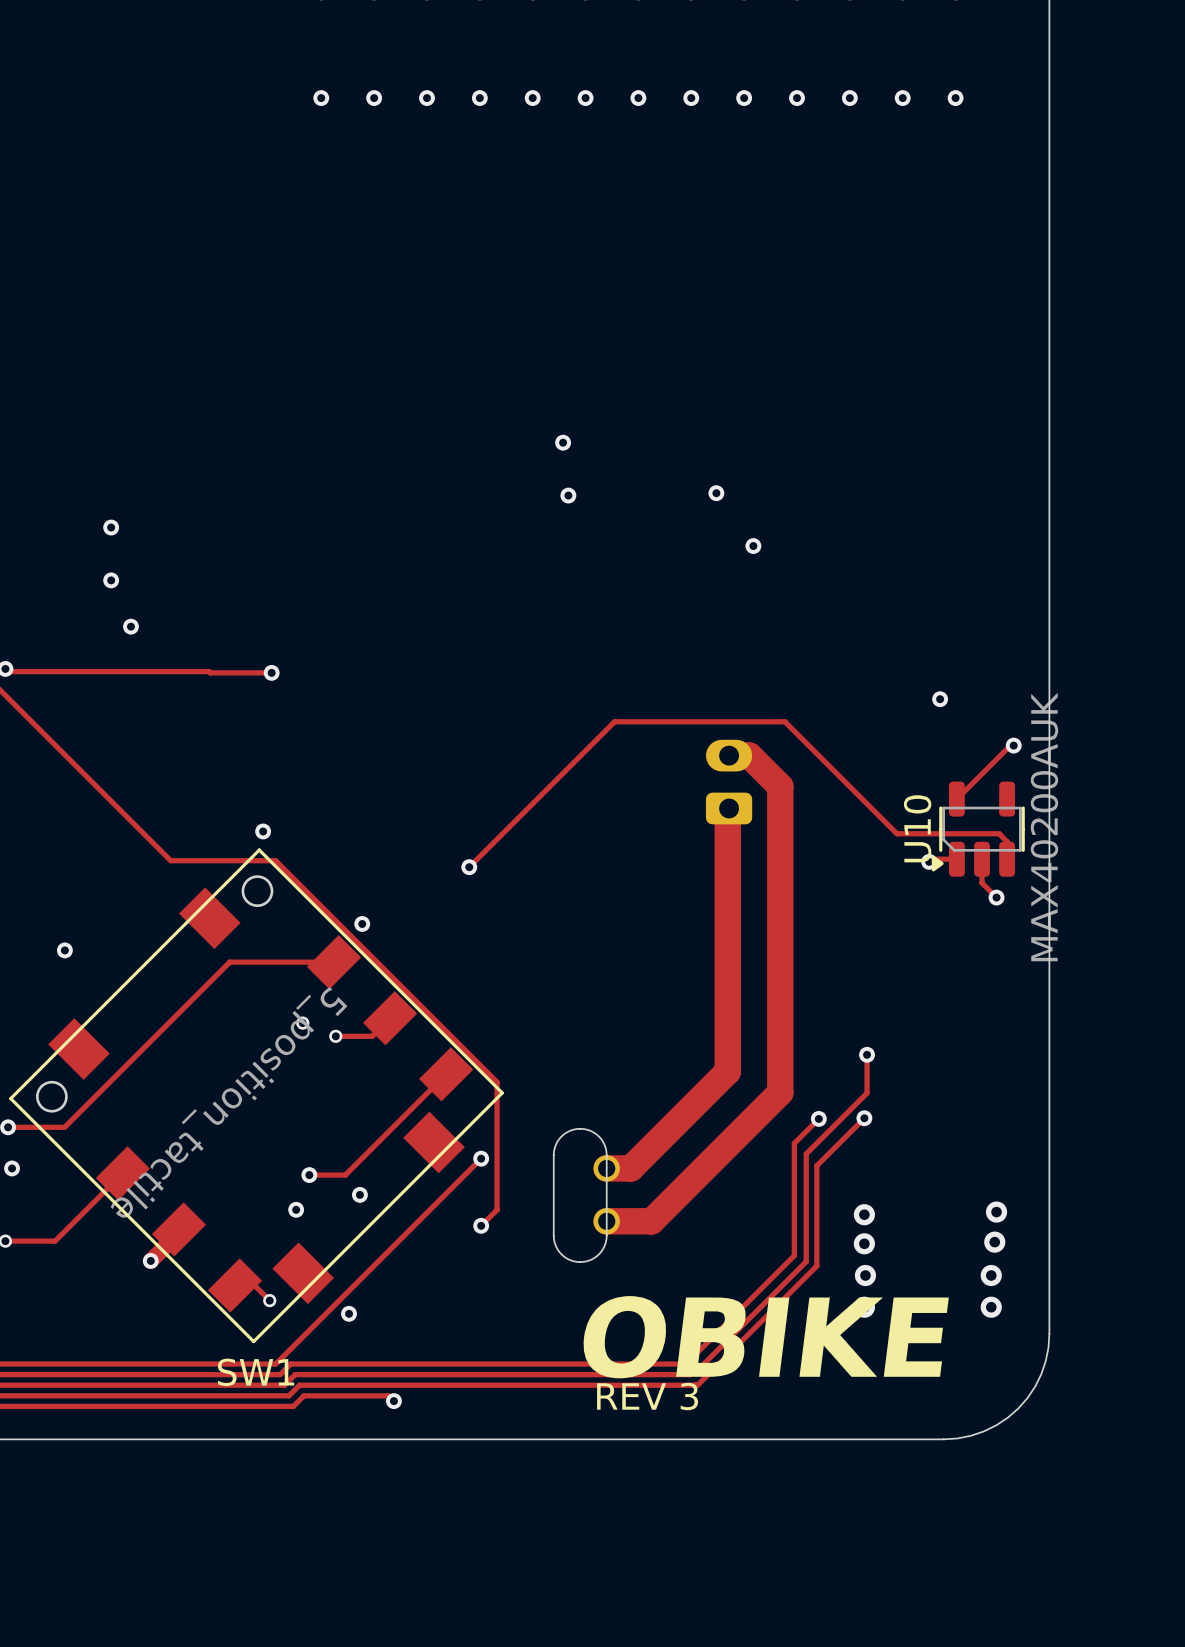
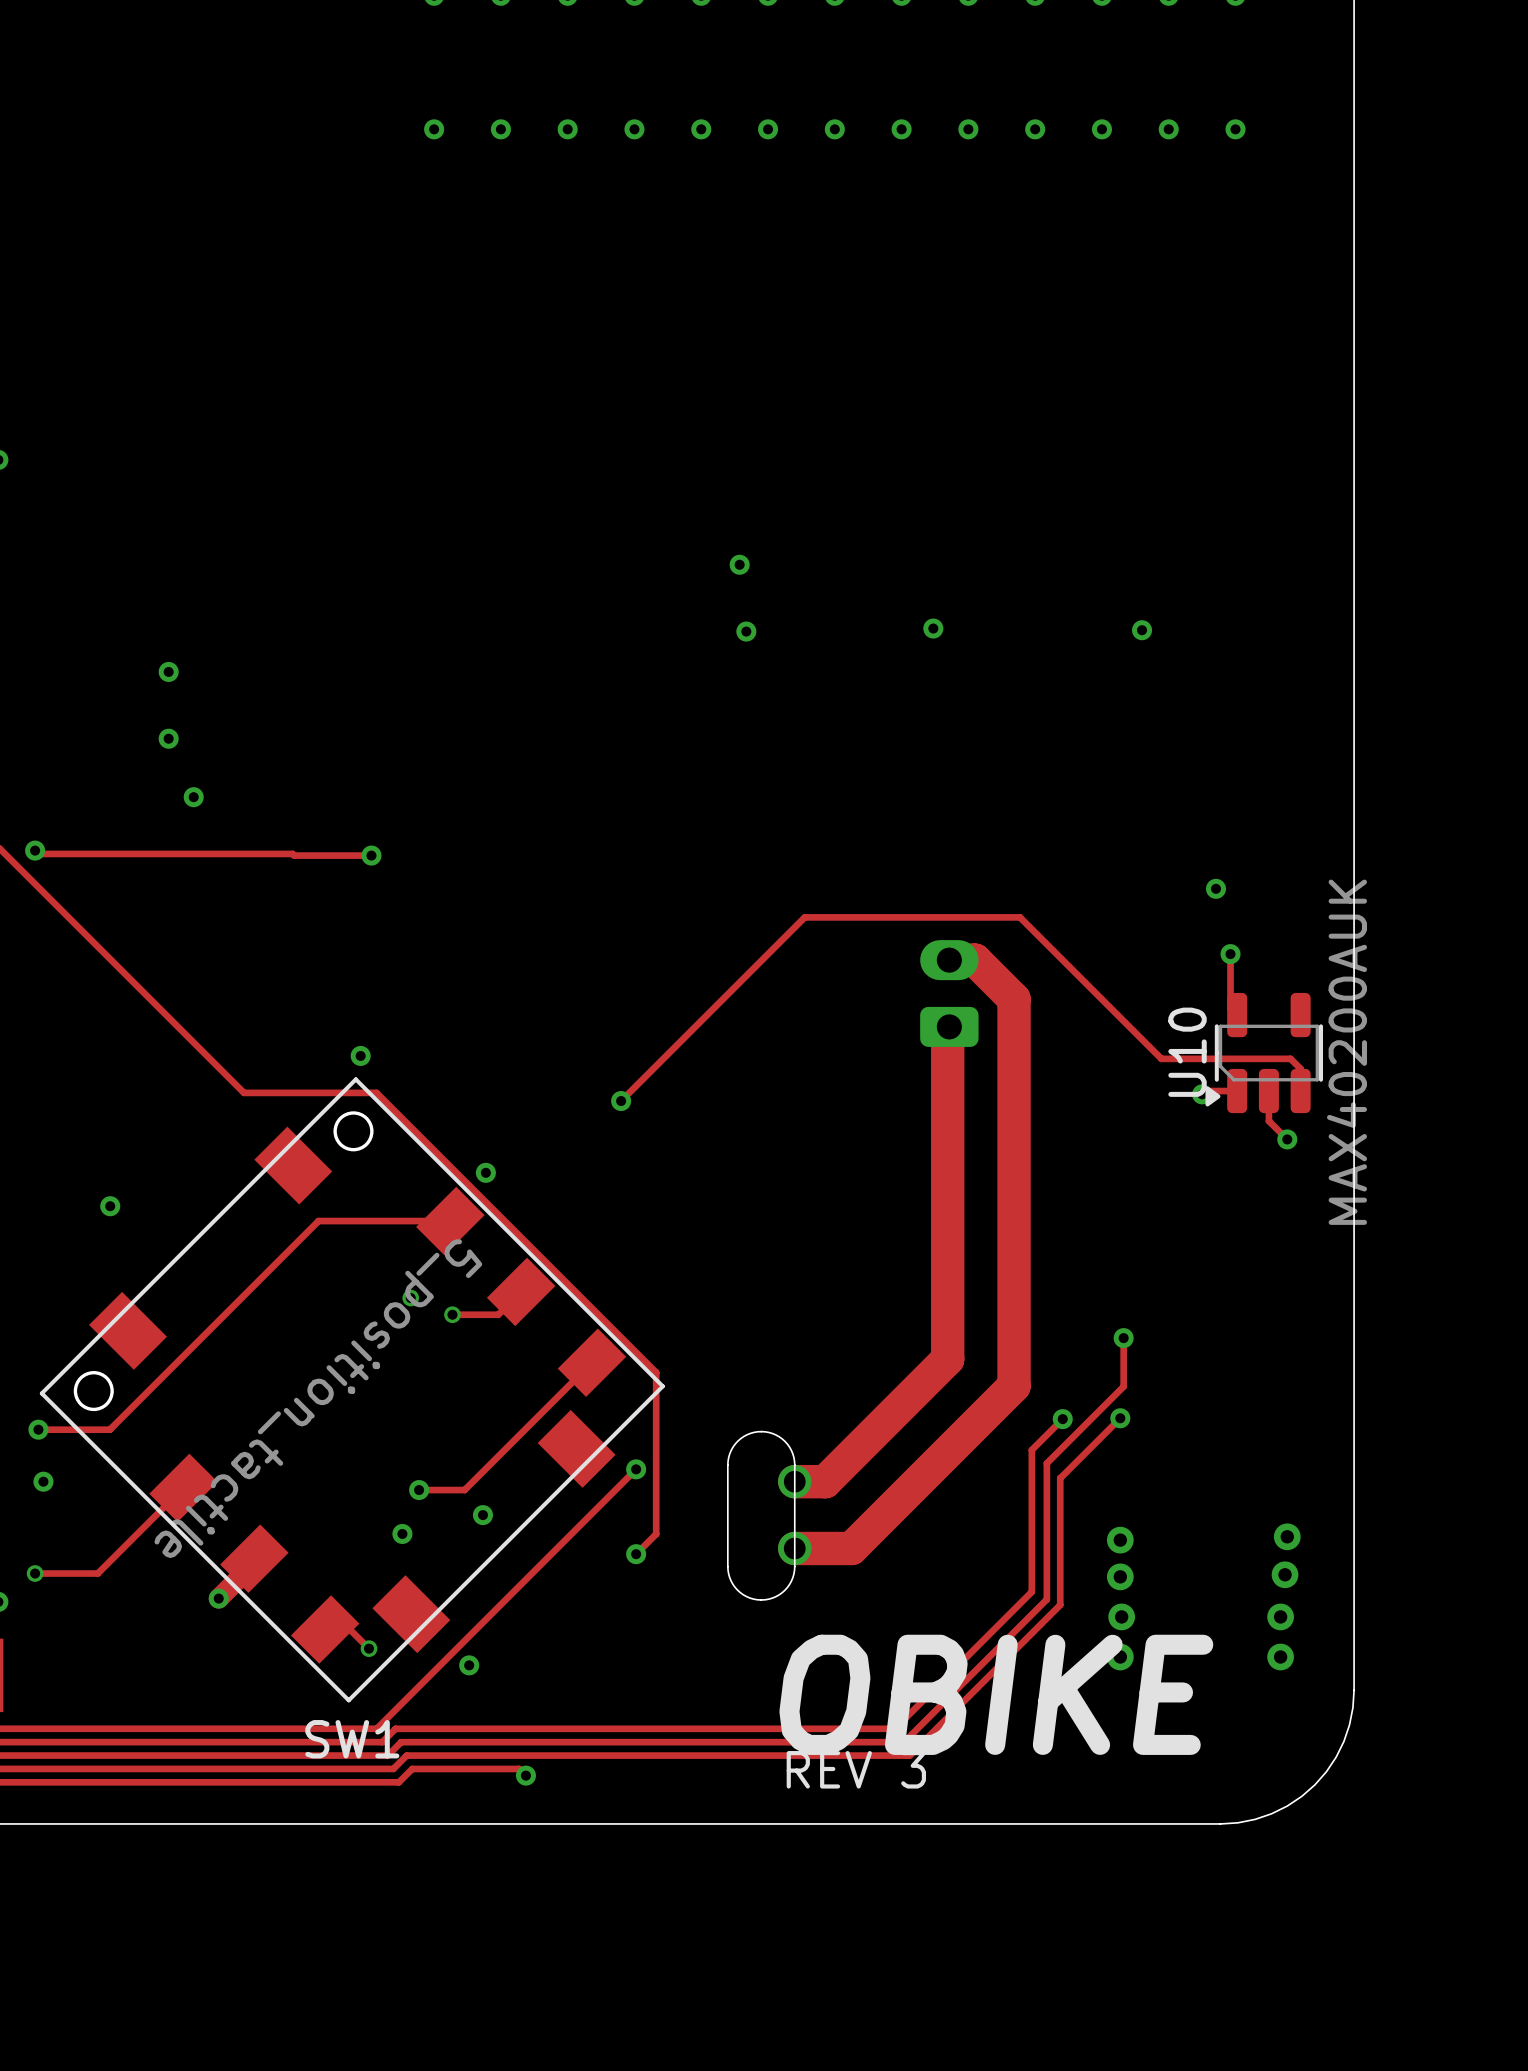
via position: (753, 546) -> (1142, 630)
track: (1013, 745) (1010, 745) (956, 799) -> (1230, 954) (1230, 1008) (1237, 1015)
via position: (1013, 745) -> (1230, 954)

